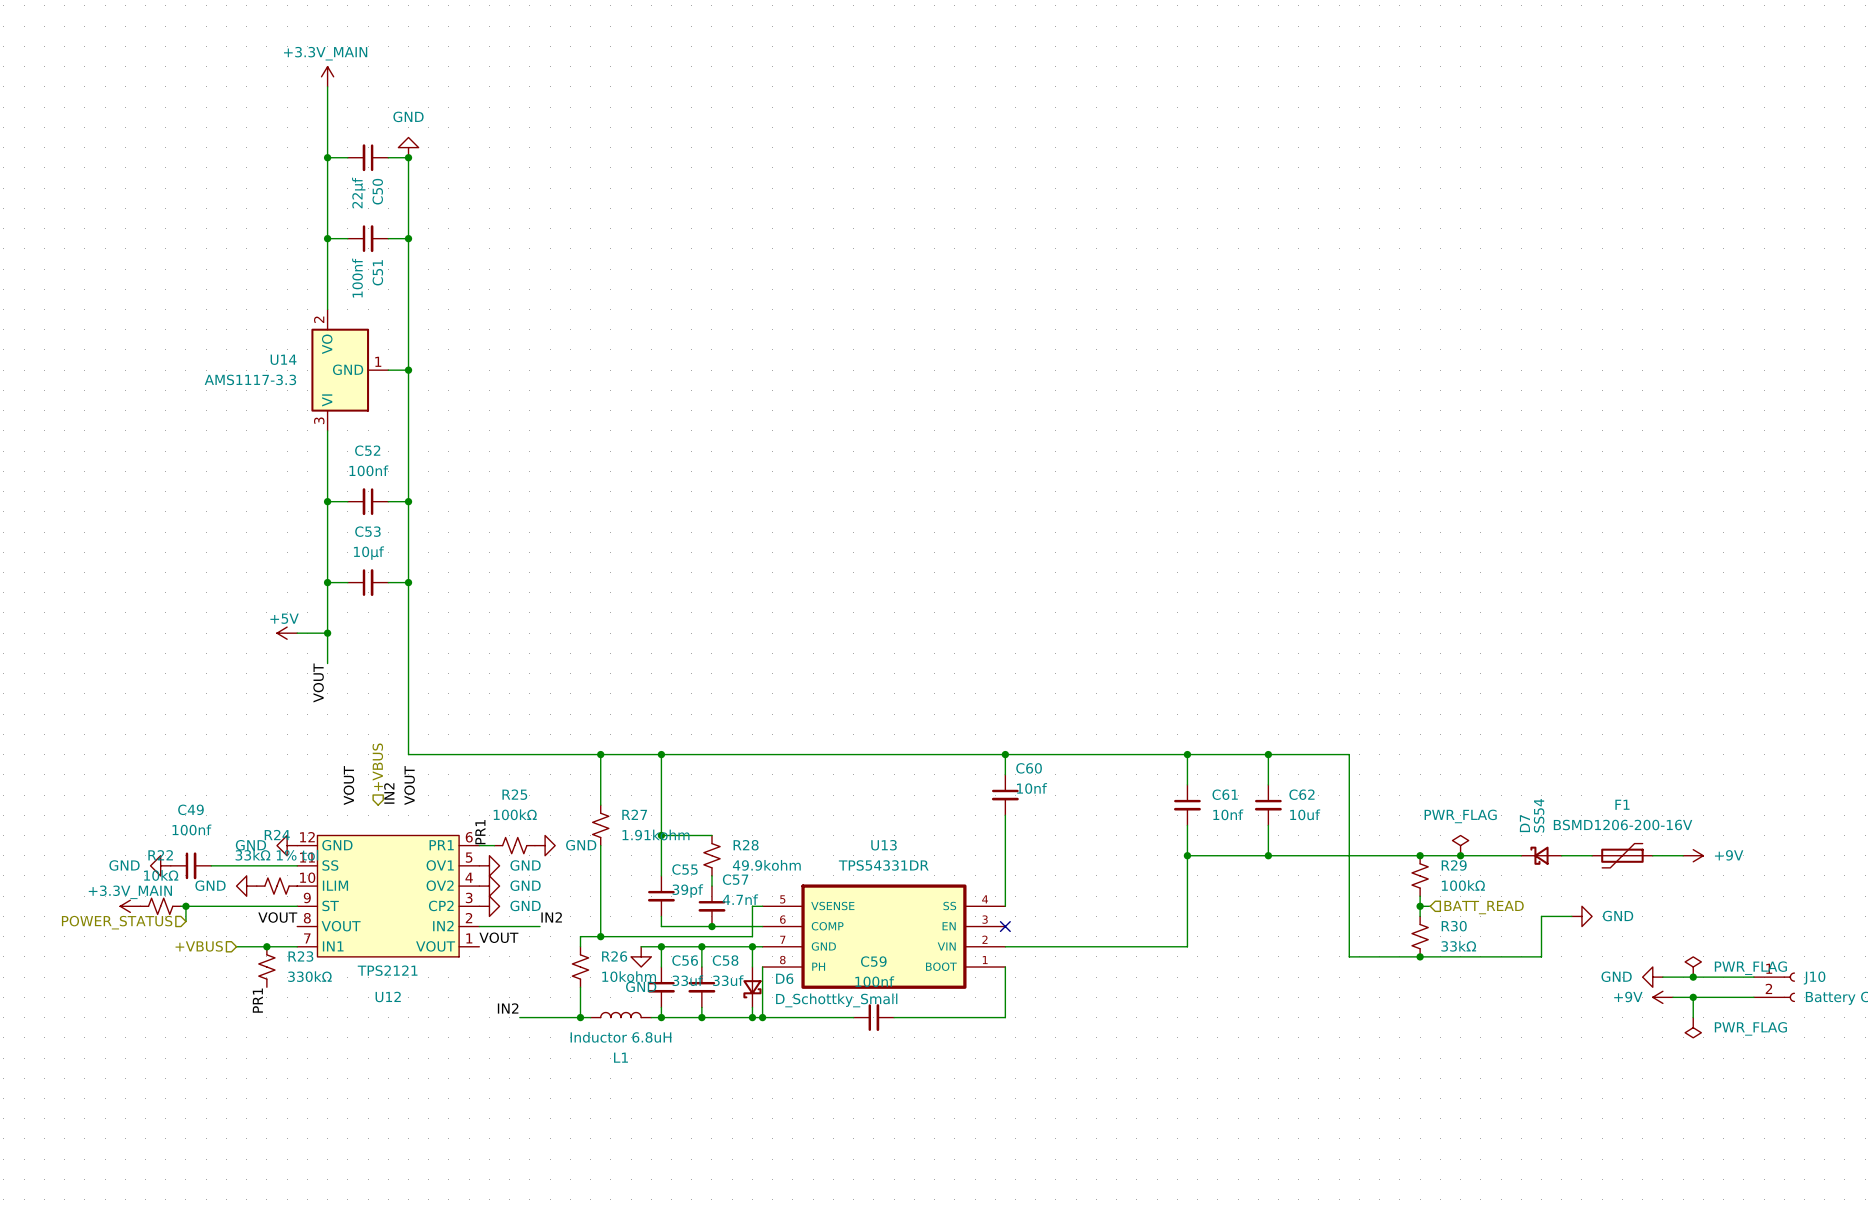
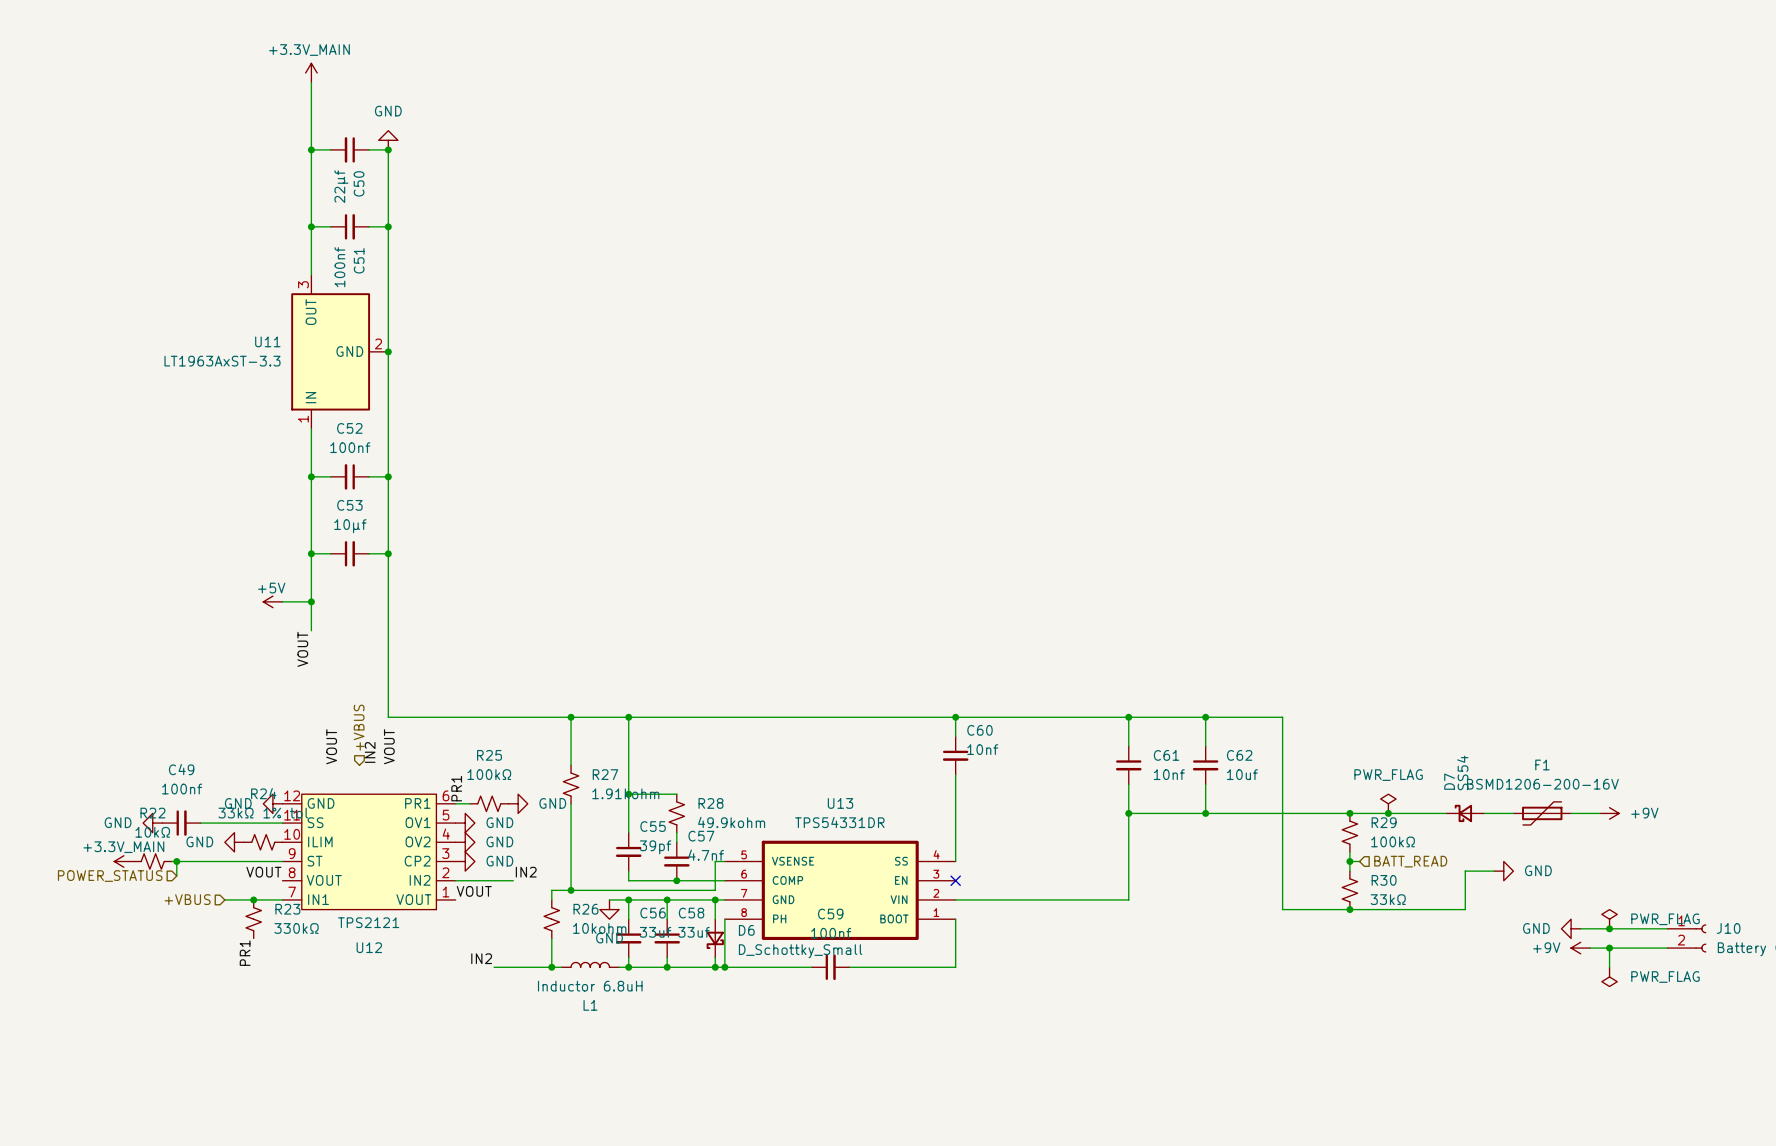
U14: AMS1117-3.3 (349, 370) -> none
U11: none -> LT1963AxST-3.3 (339, 351)

